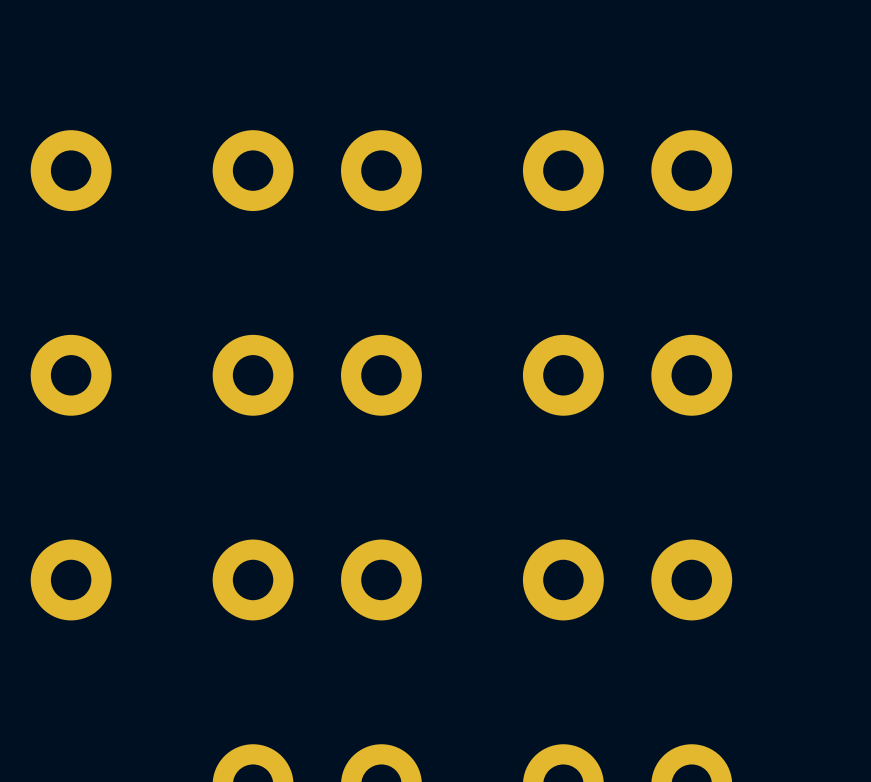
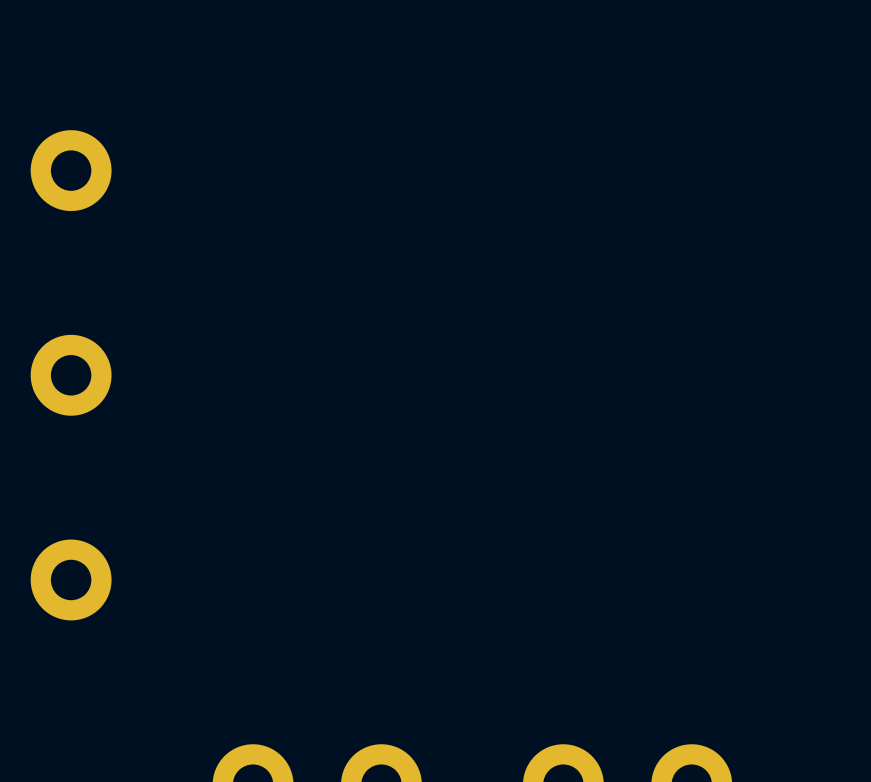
part: (317, 170) -> none
part: (627, 170) -> none
part: (317, 375) -> none
part: (627, 375) -> none
part: (317, 579) -> none
part: (627, 579) -> none

